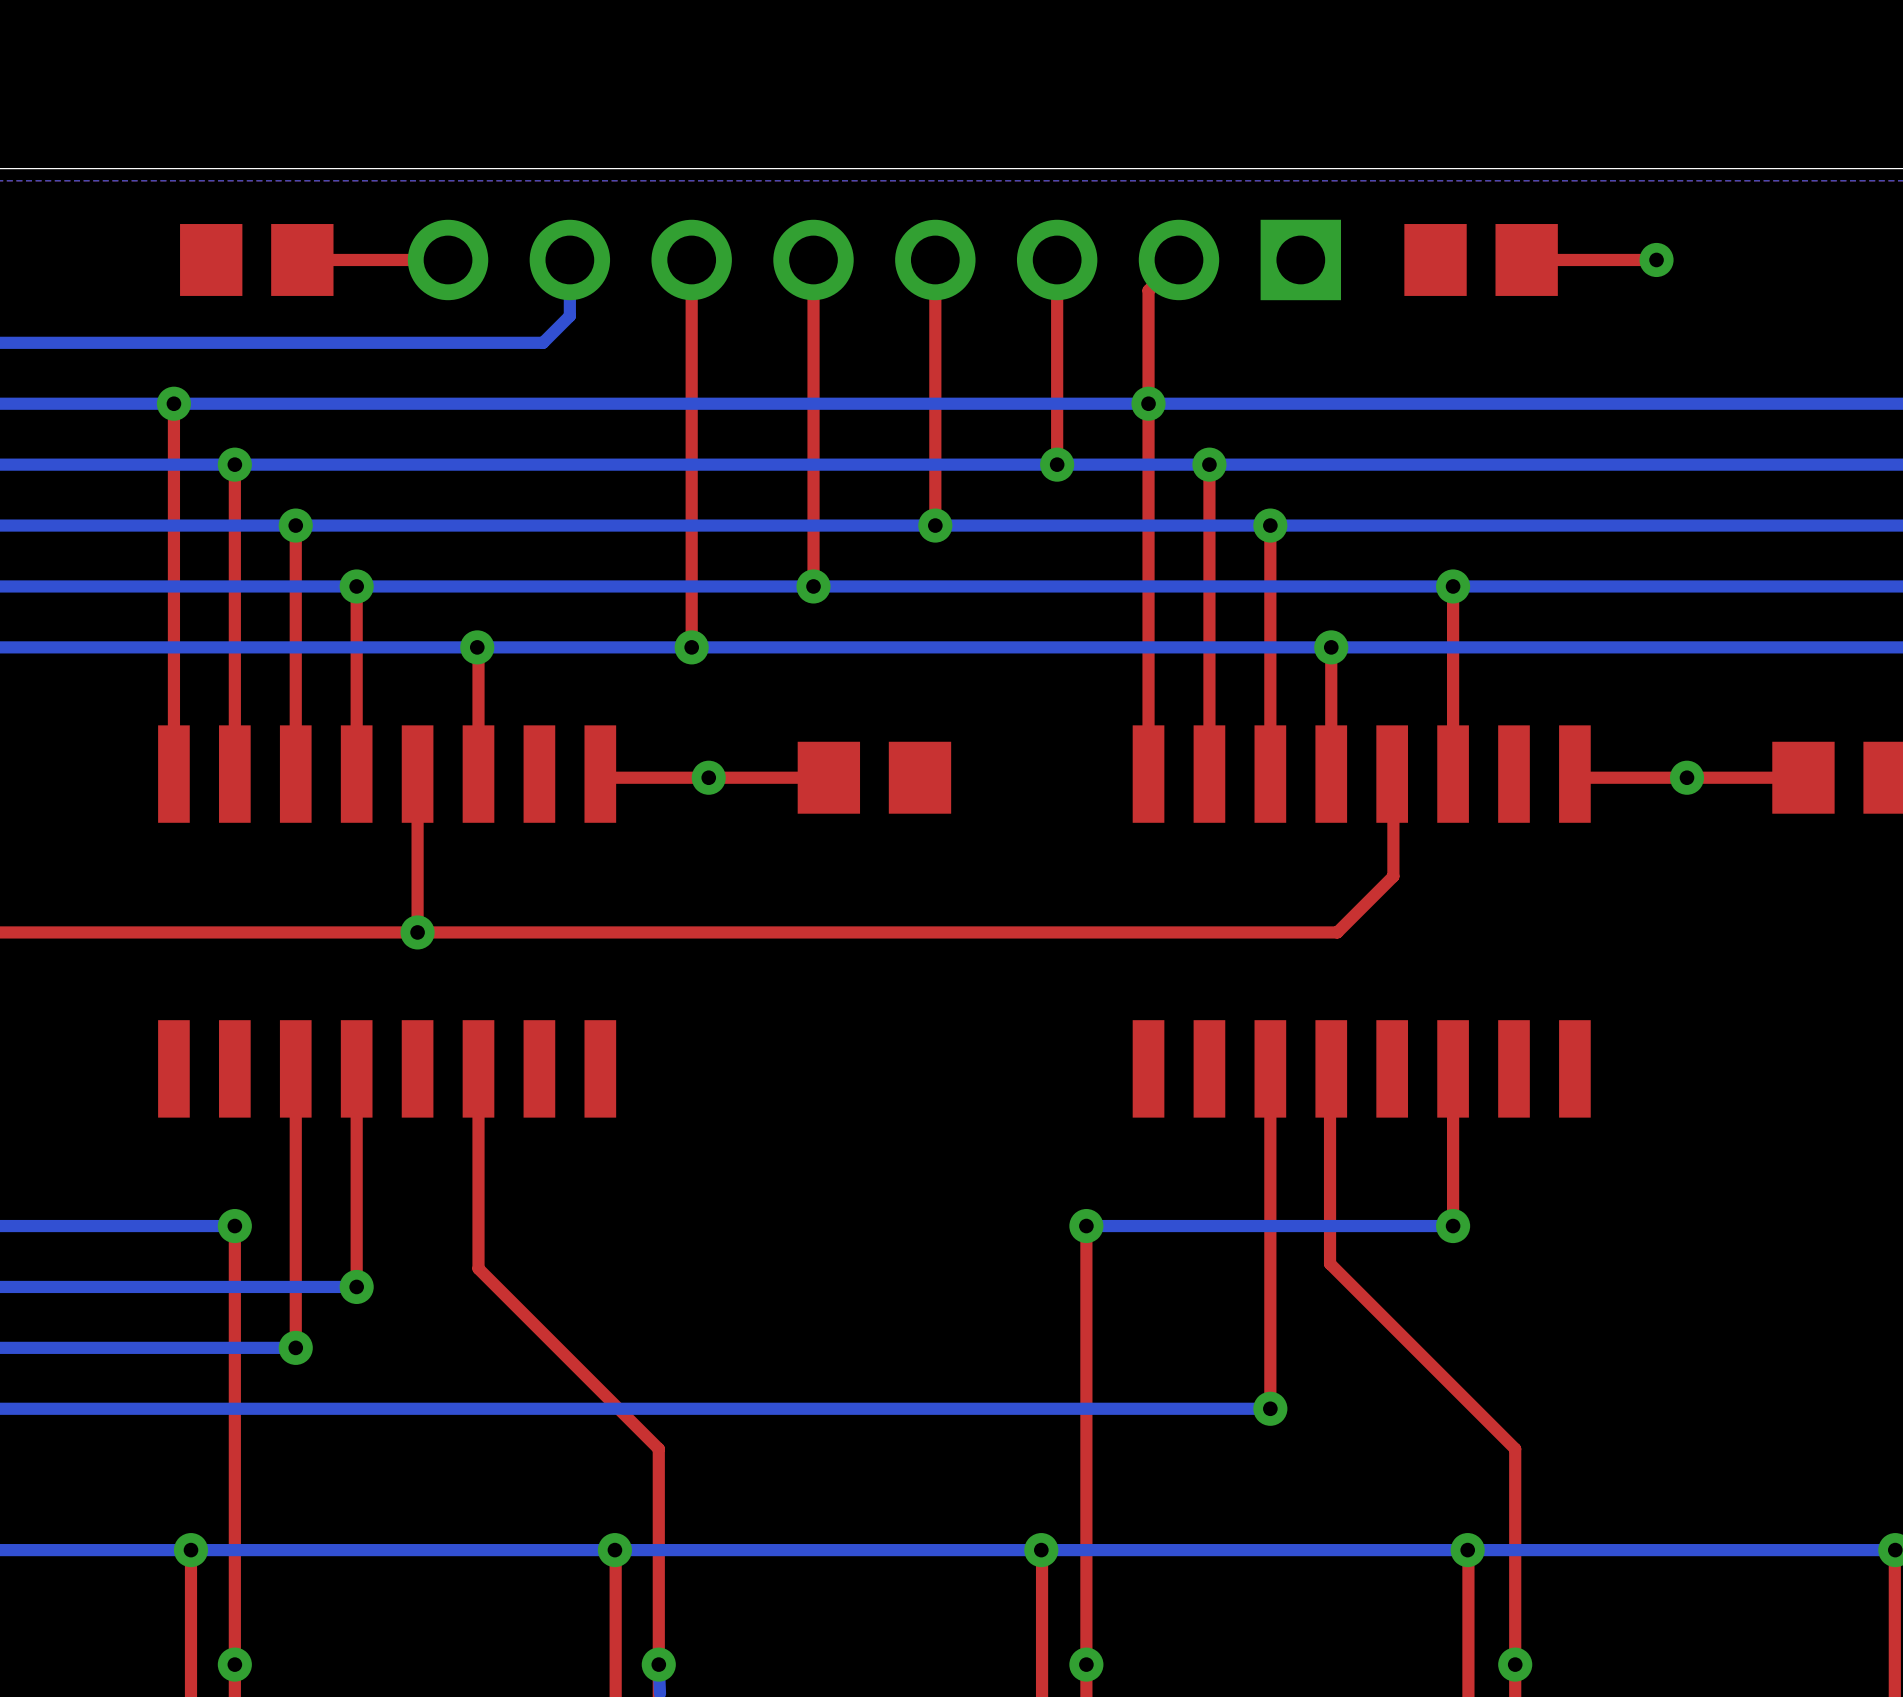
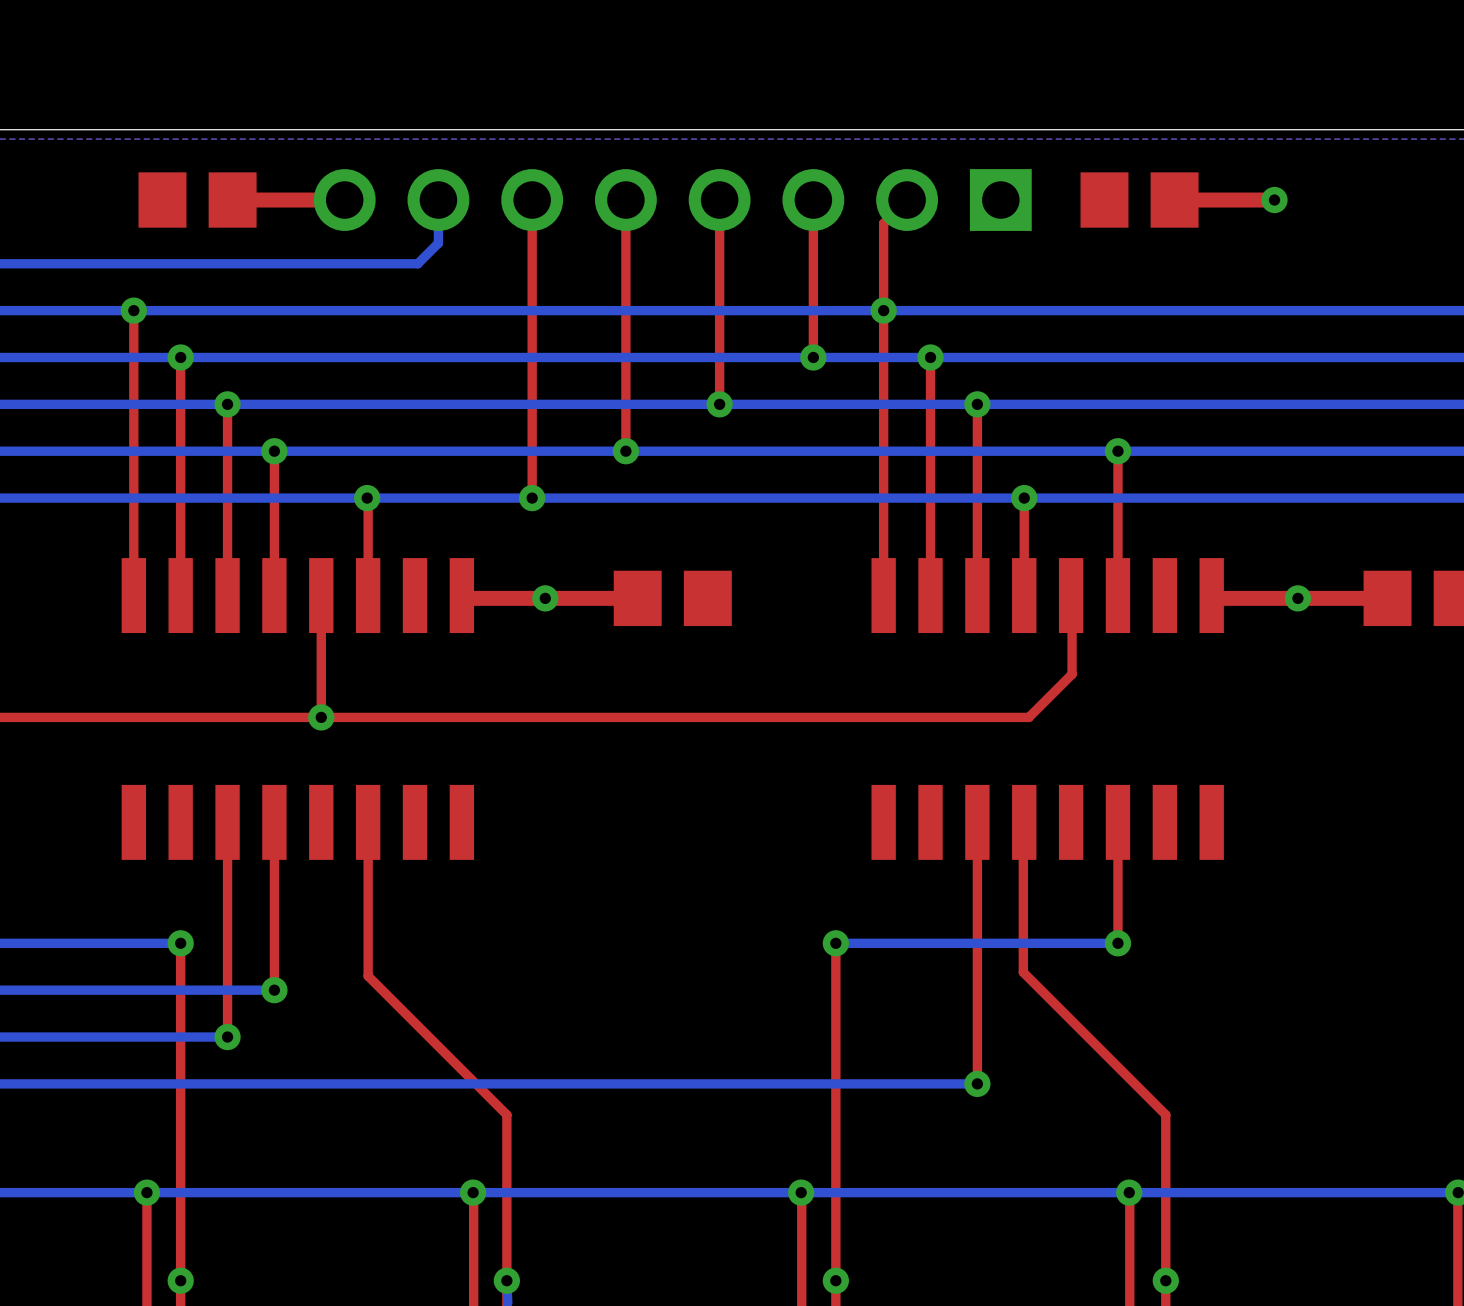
top track width: thin (448, 259) (302, 259) -> thick (344, 200) (232, 200)
top track width: thin (1656, 259) (1526, 259) -> thick (1274, 200) (1174, 200)
top track width: thin (600, 774) (600, 777) (828, 777) -> thick (461, 595) (461, 598) (637, 598)
top track width: thin (1574, 774) (1574, 777) (1803, 777) -> thick (1211, 595) (1211, 598) (1387, 598)

